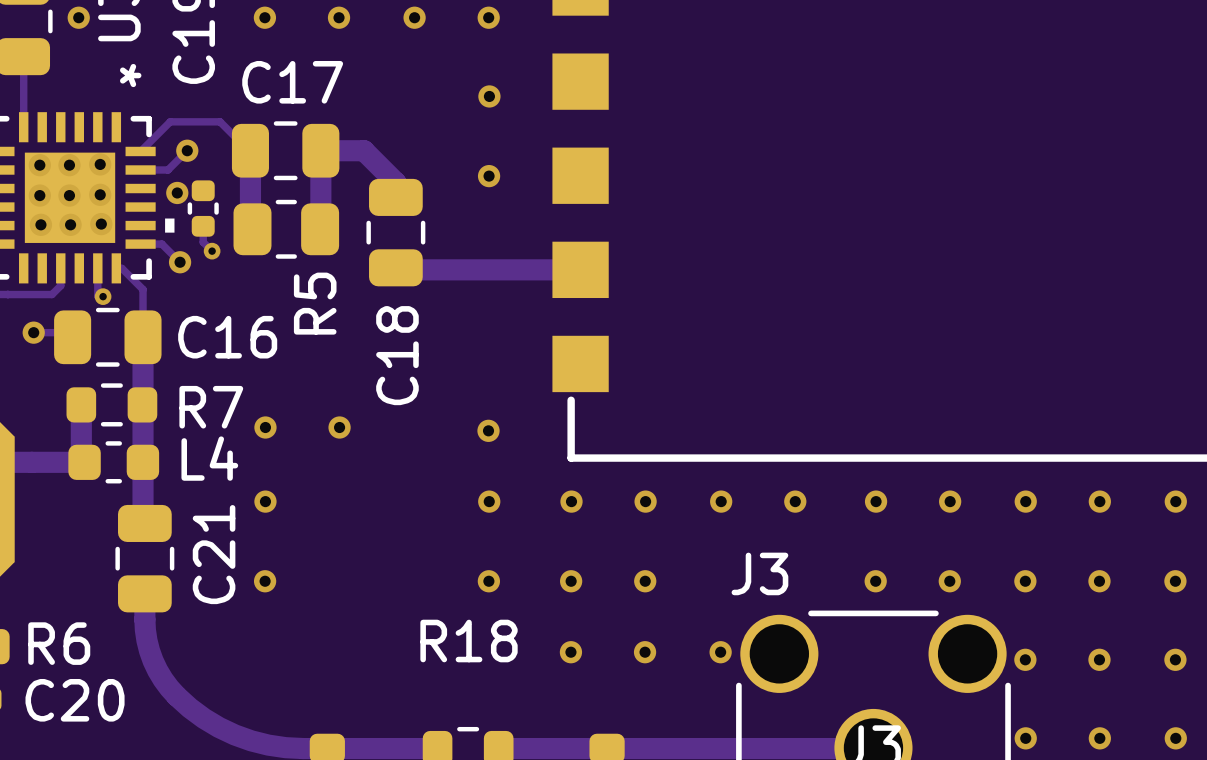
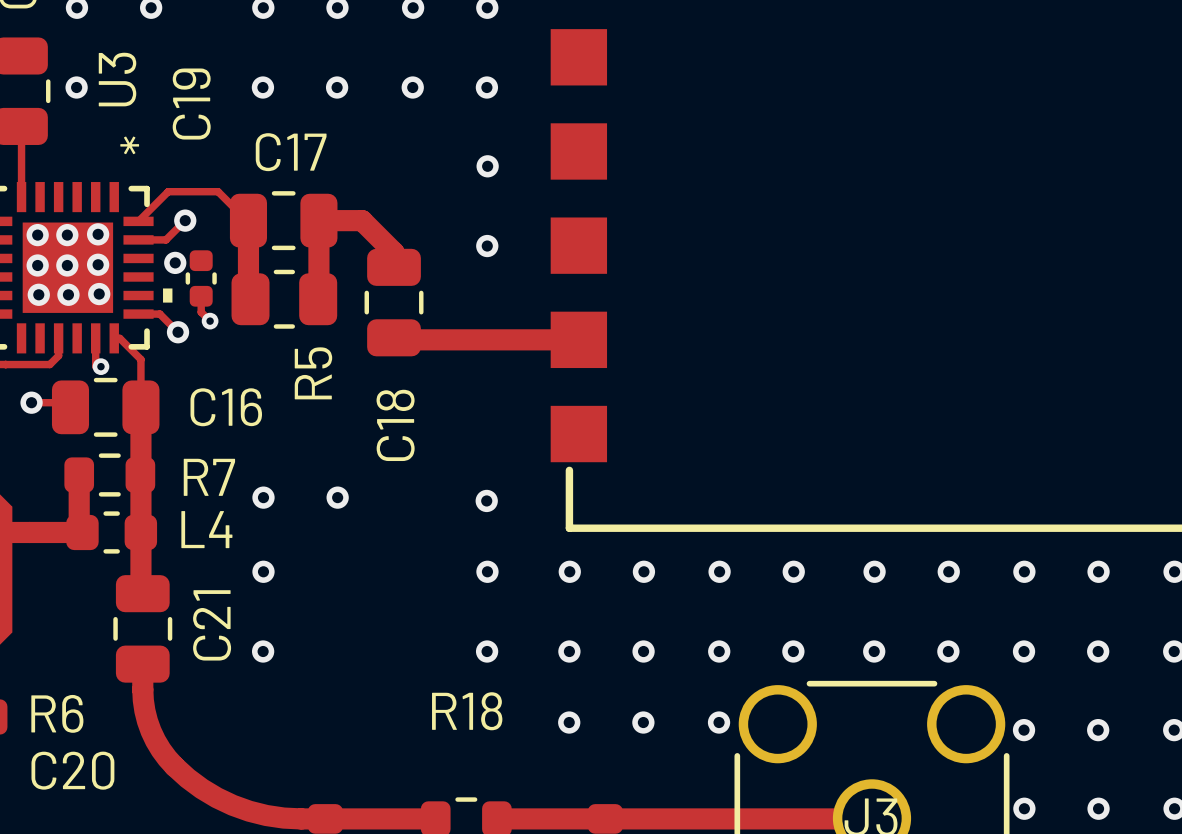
text: J3 (759, 573) -> none
via: none -> (719, 651)
via: none -> (793, 651)

